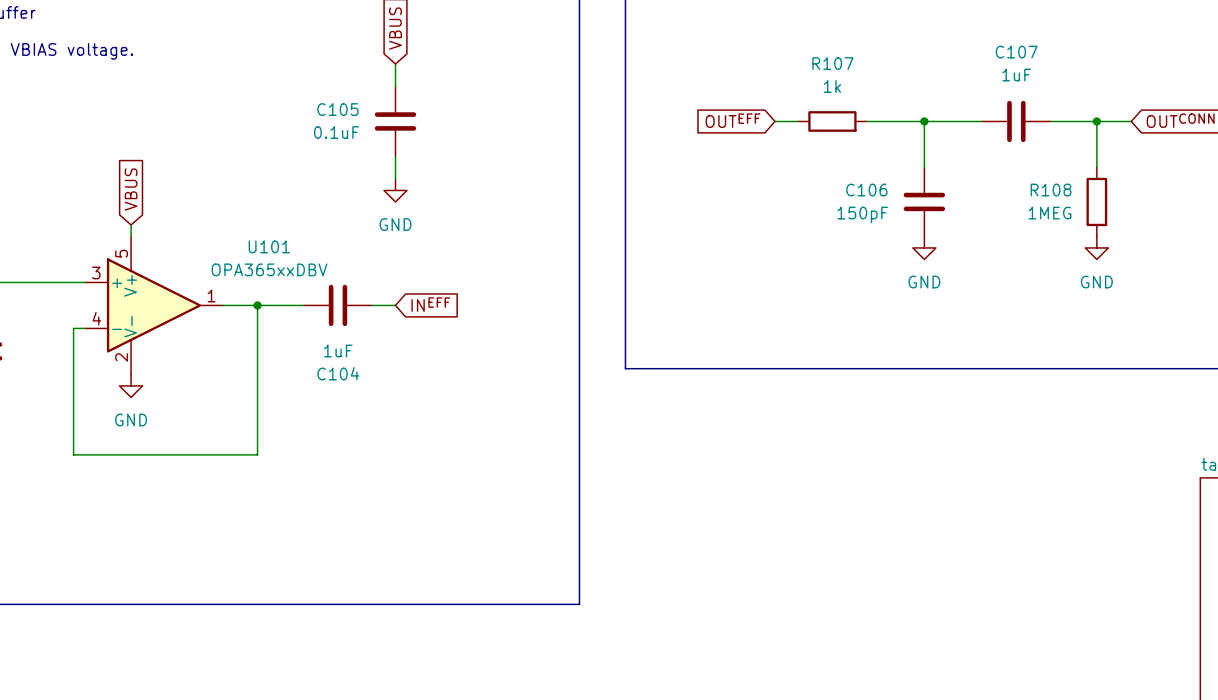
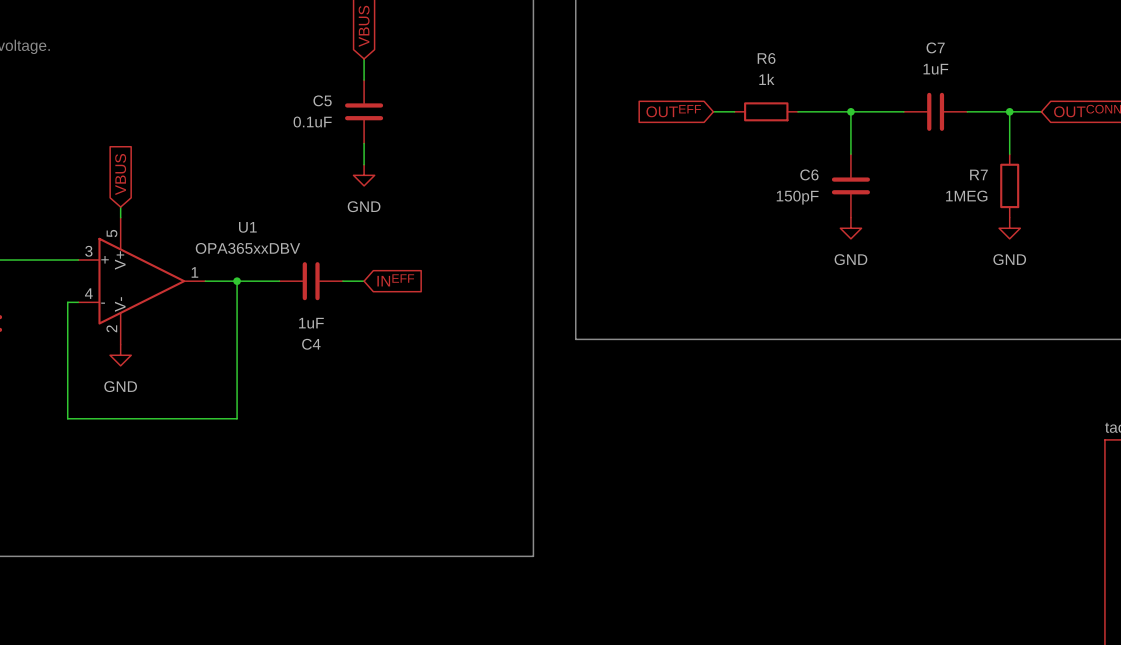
C107 name: C107 (1016, 52) -> C7 (935, 47)
R107 name: R107 (832, 63) -> R6 (766, 58)
C105 name: C105 (337, 109) -> C5 (322, 100)
C106 name: C106 (866, 190) -> C6 (809, 174)
R108 name: R108 (1051, 190) -> R7 (978, 174)
U101 name: U101 (269, 246) -> U1 (247, 227)
C104 name: C104 (338, 373) -> C4 (311, 344)

